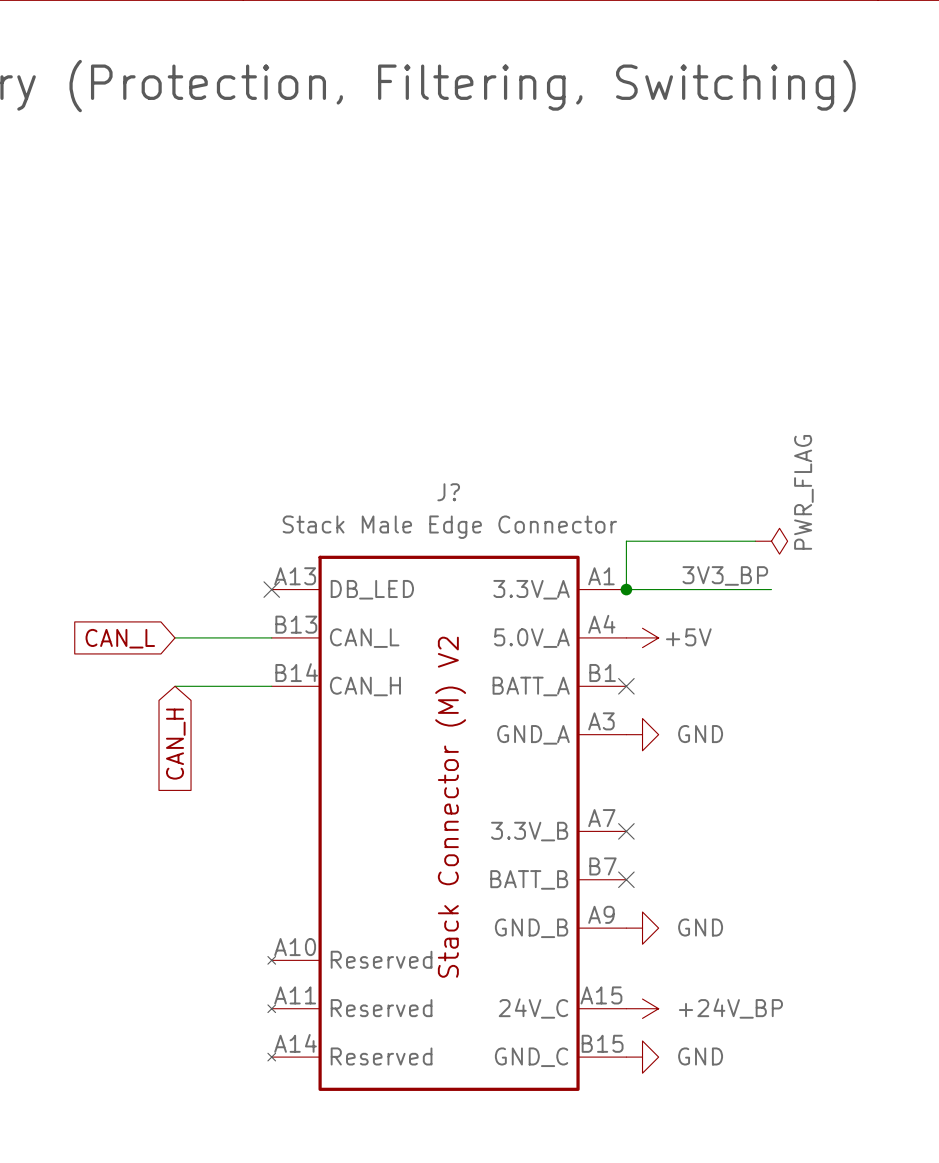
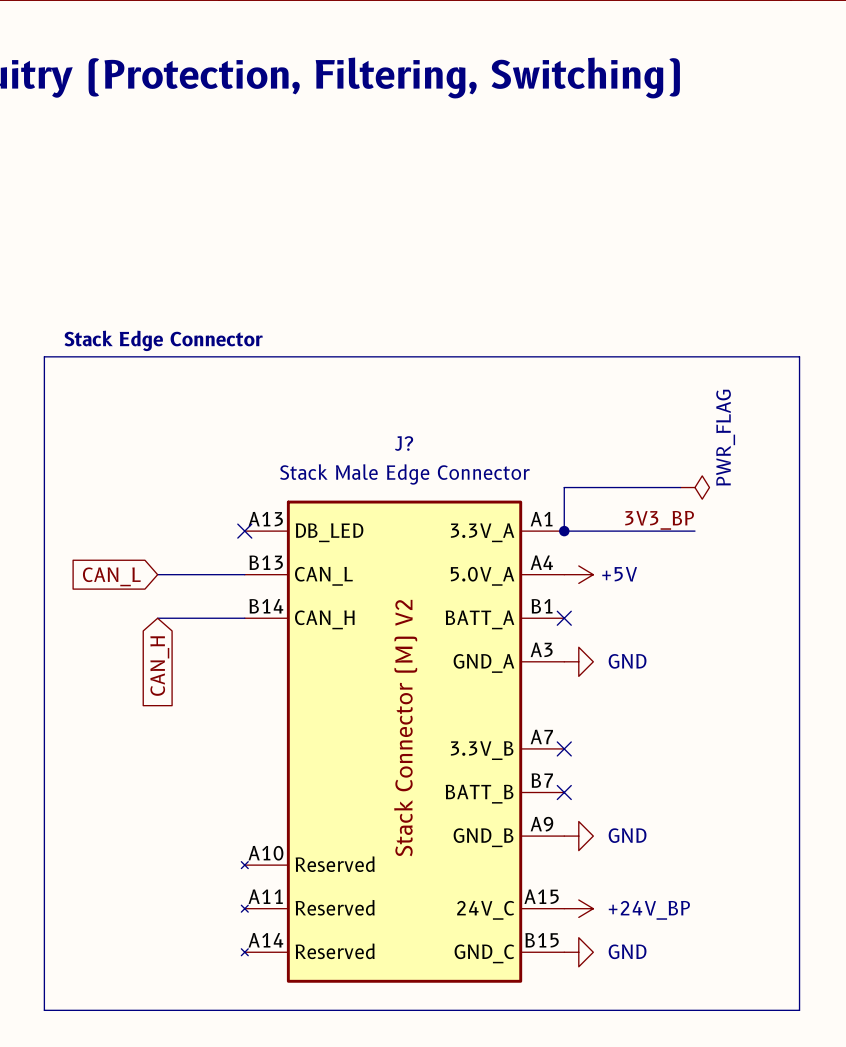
text: none -> Stack Edge Connector (163, 340)
line: none -> (44, 356) (799, 356) (799, 1010) (44, 1010) (44, 356)

